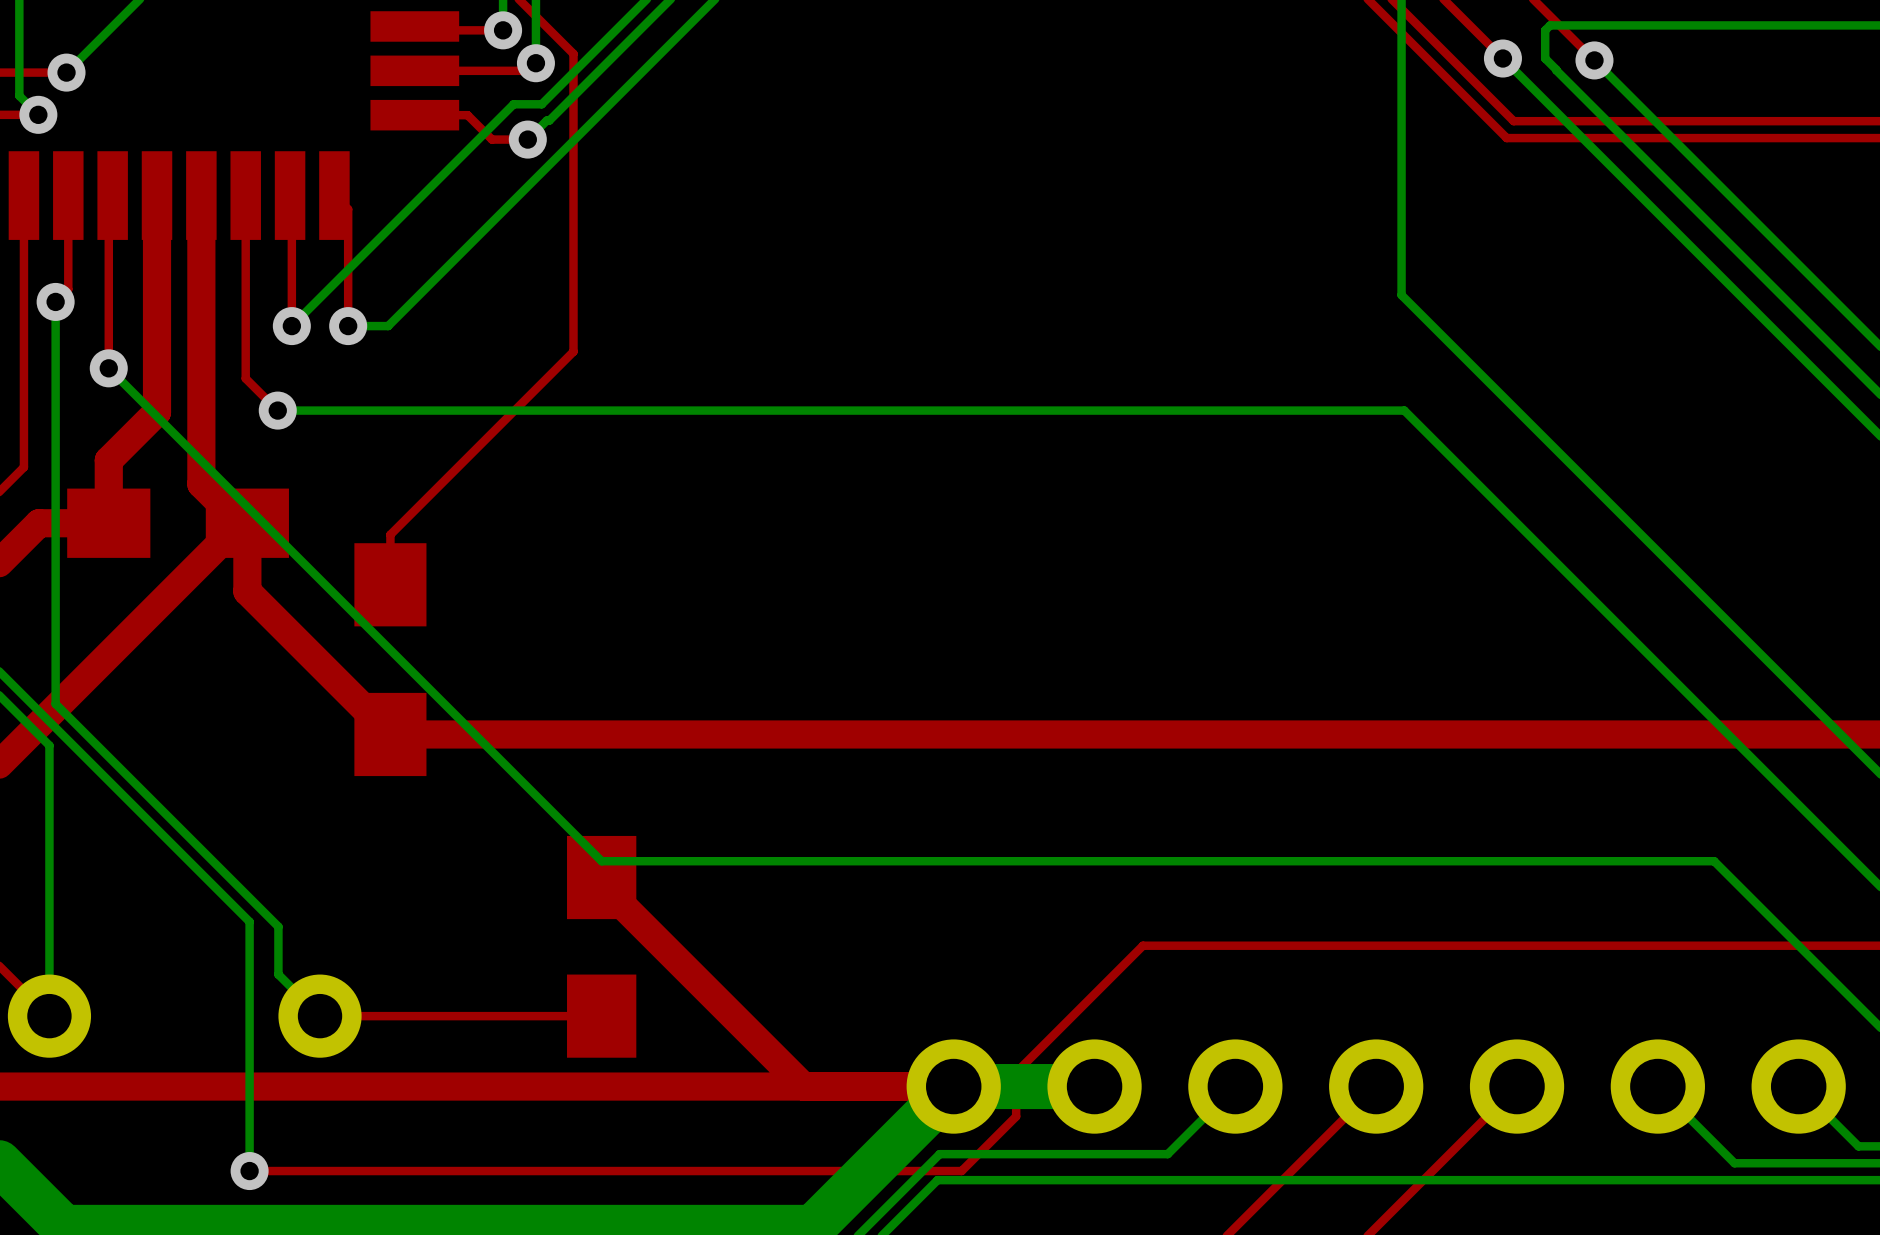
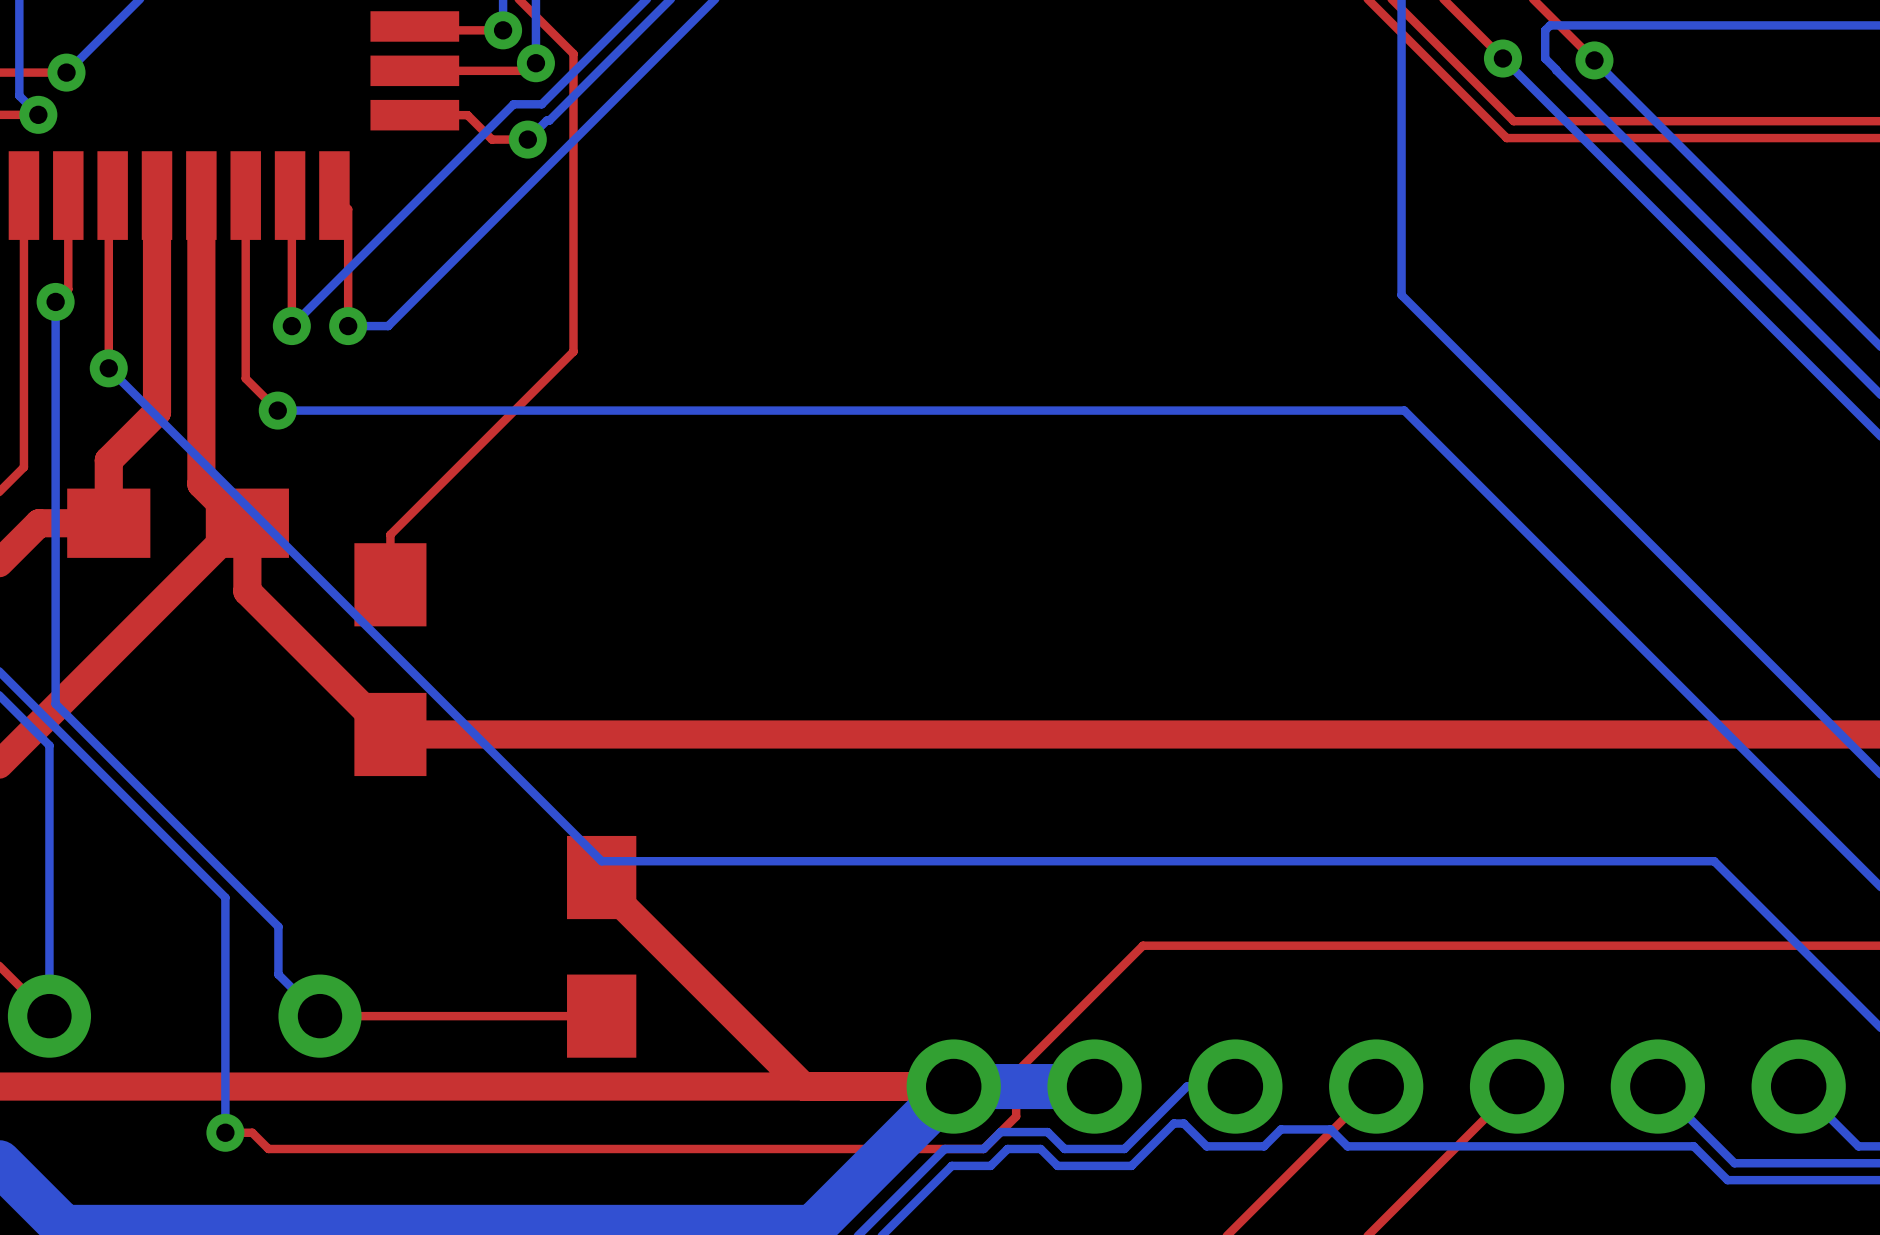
bottom track: (225, 897) (249, 921) (249, 1171) -> (225, 897) (225, 1132)
bottom track: (1235, 1086) (1167, 1154) (939, 1154) -> (1235, 1086) (1186, 1086) (1124, 1148) (1064, 1148) (1047, 1132) (1000, 1132) (983, 1148) (944, 1148) (939, 1154)
top track: (983, 1148) (961, 1171) (249, 1171) -> (983, 1148) (268, 1148) (252, 1132) (225, 1132)
via position: (249, 1171) -> (225, 1132)
bottom track: (1727, 1180) (937, 1180) -> (1727, 1180) (1693, 1146) (1347, 1146) (1330, 1129) (1280, 1129) (1264, 1146) (1206, 1146) (1183, 1123) (1173, 1123) (1131, 1165) (1057, 1165) (1040, 1148) (1007, 1148) (990, 1165) (951, 1165) (937, 1180)

